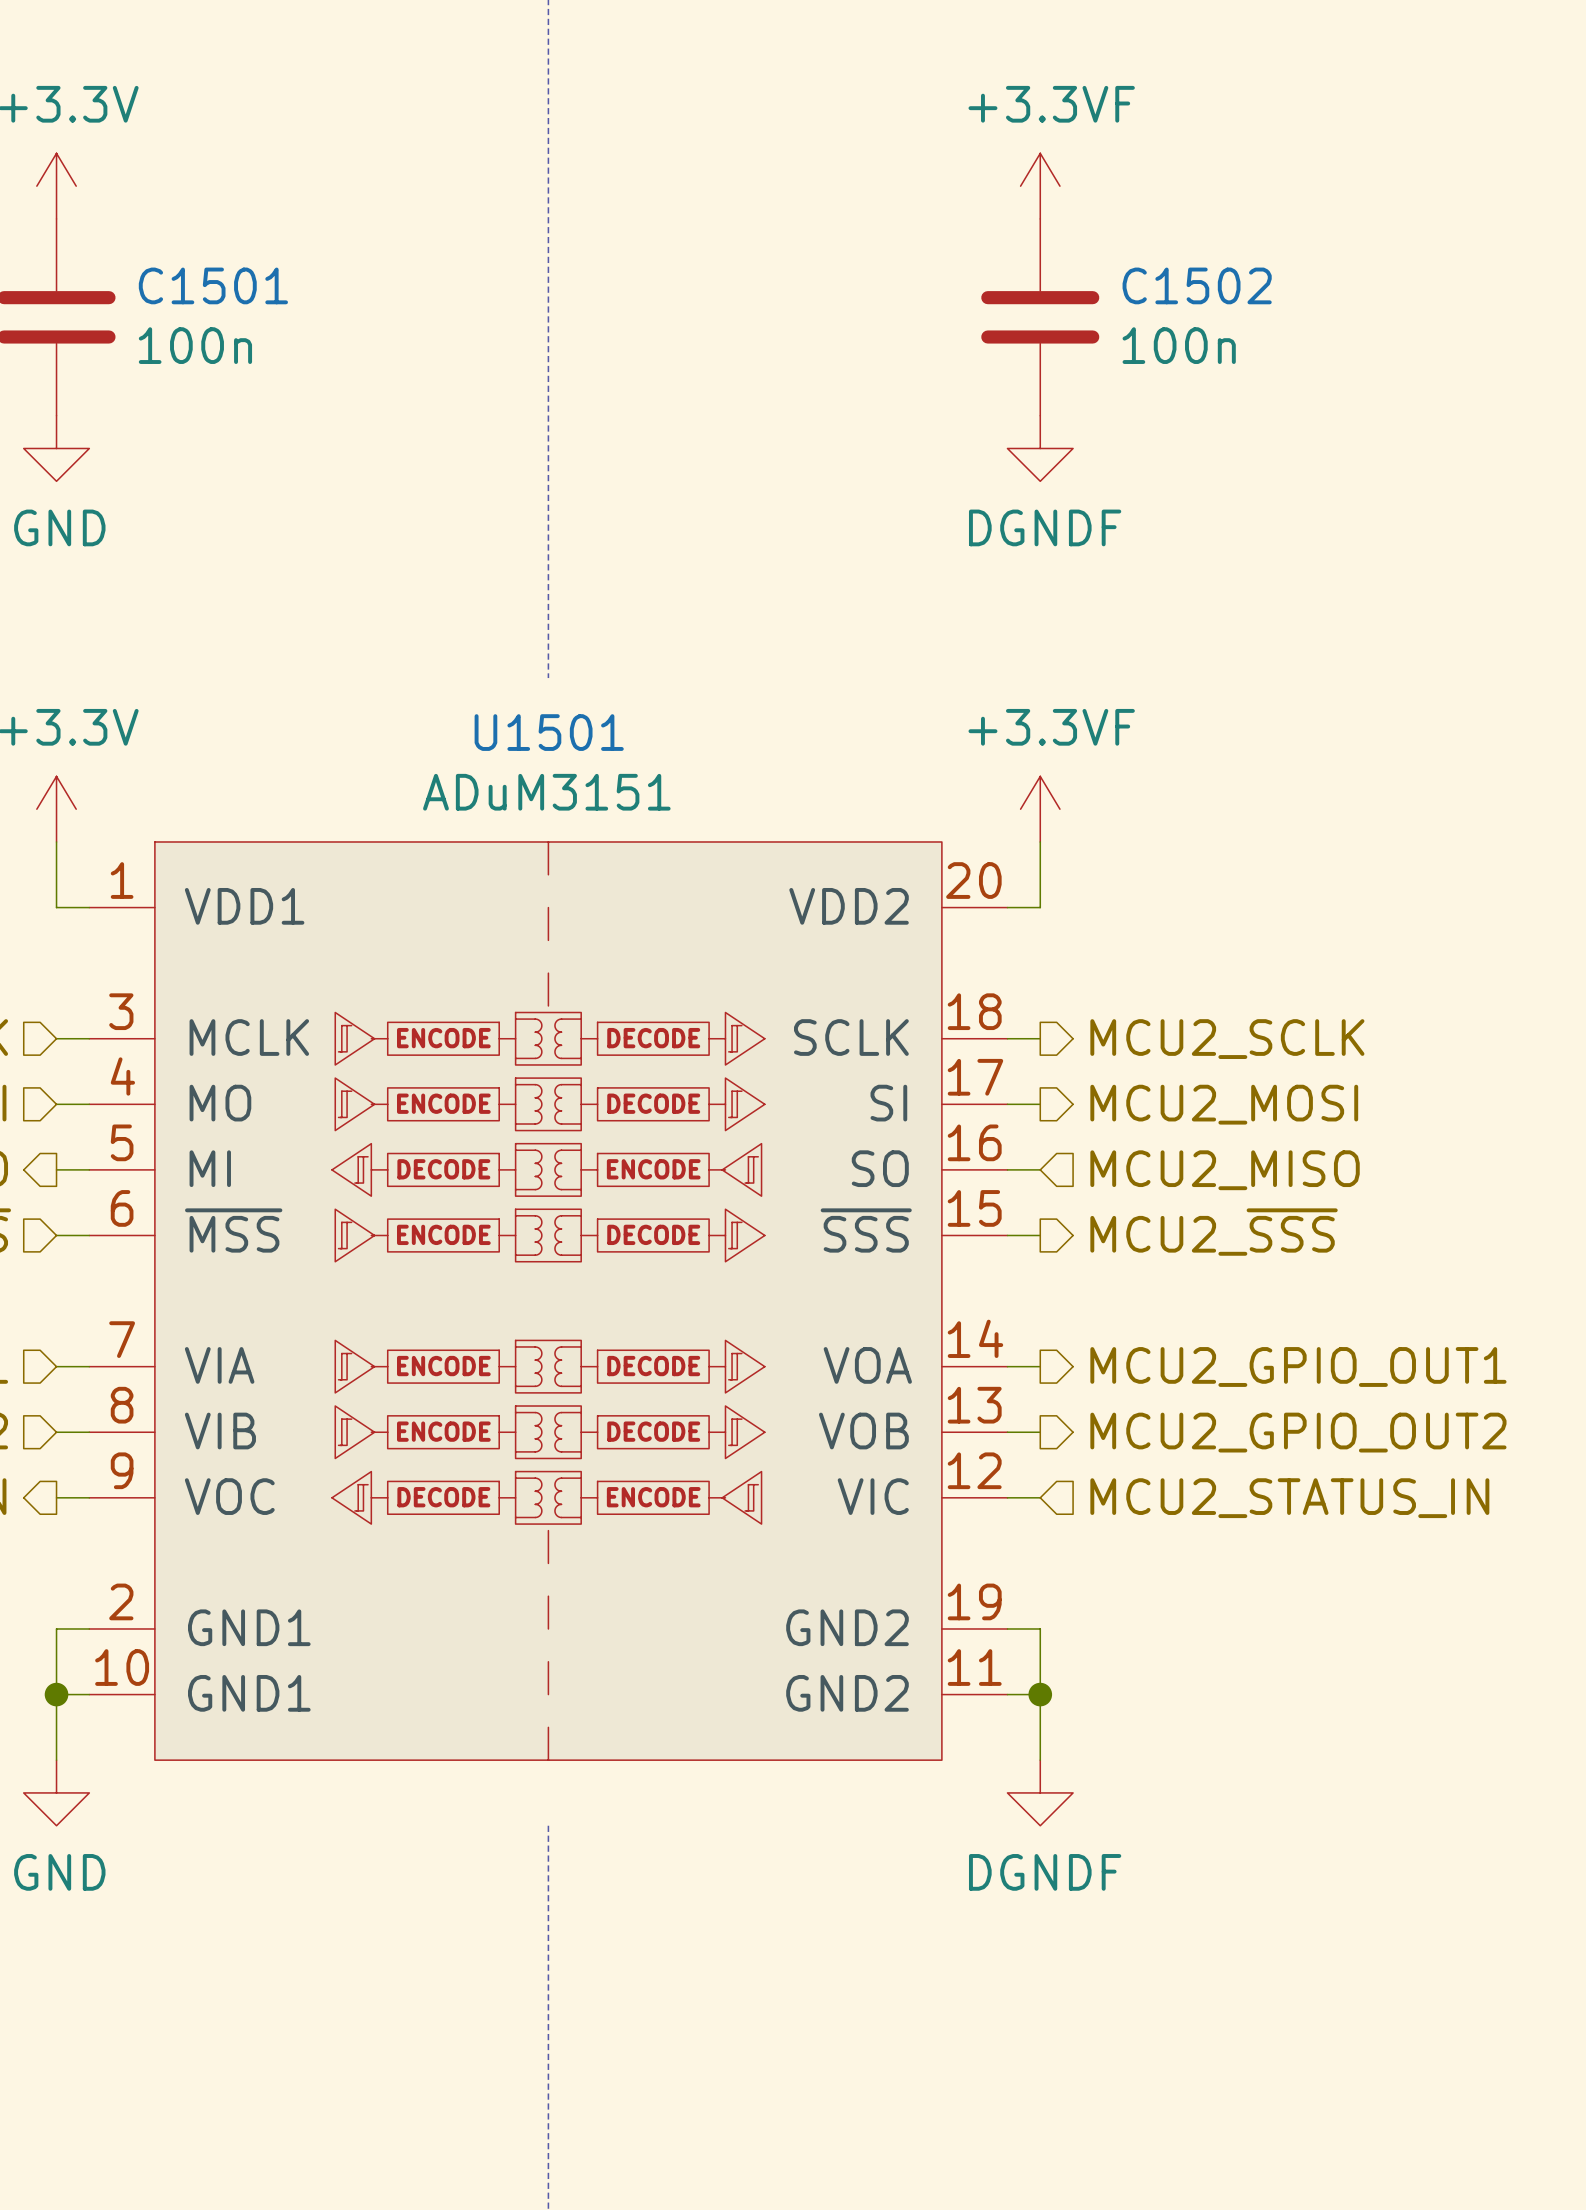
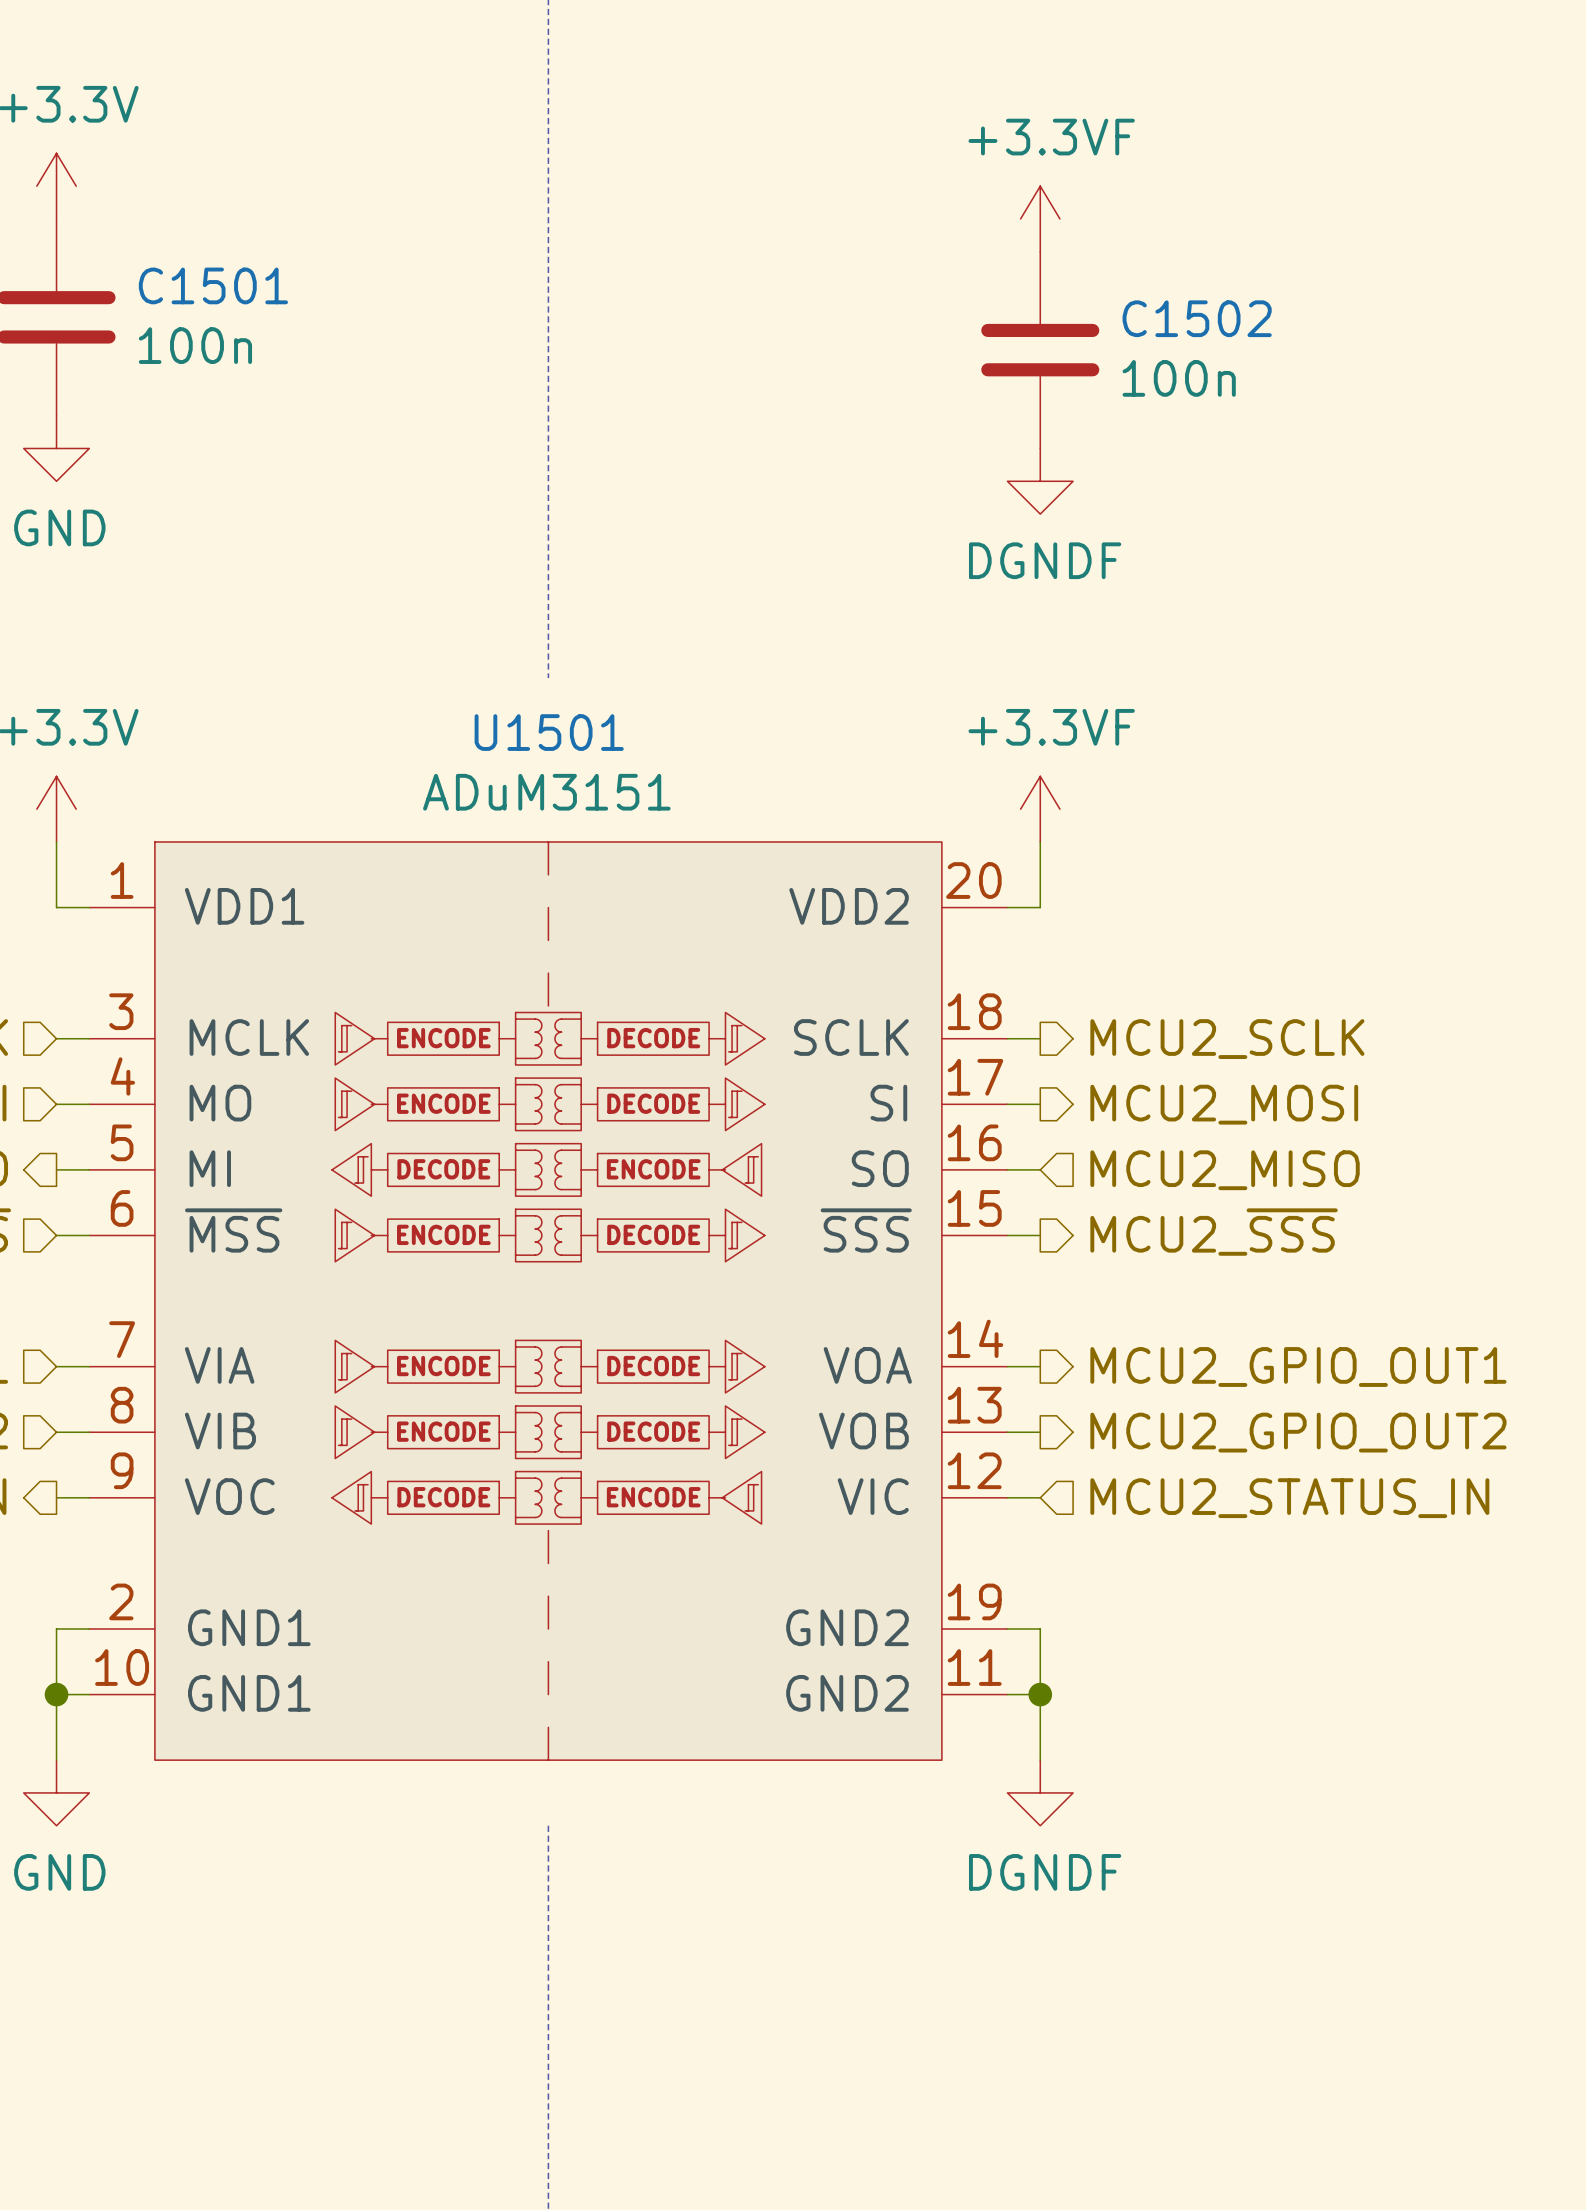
power symbol position: +3.3VF (1040, 186) -> +3.3VF (1040, 218)
C1502 position: (1040, 317) -> (1040, 350)
power symbol position: DGNDF (1040, 448) -> DGNDF (1040, 481)

